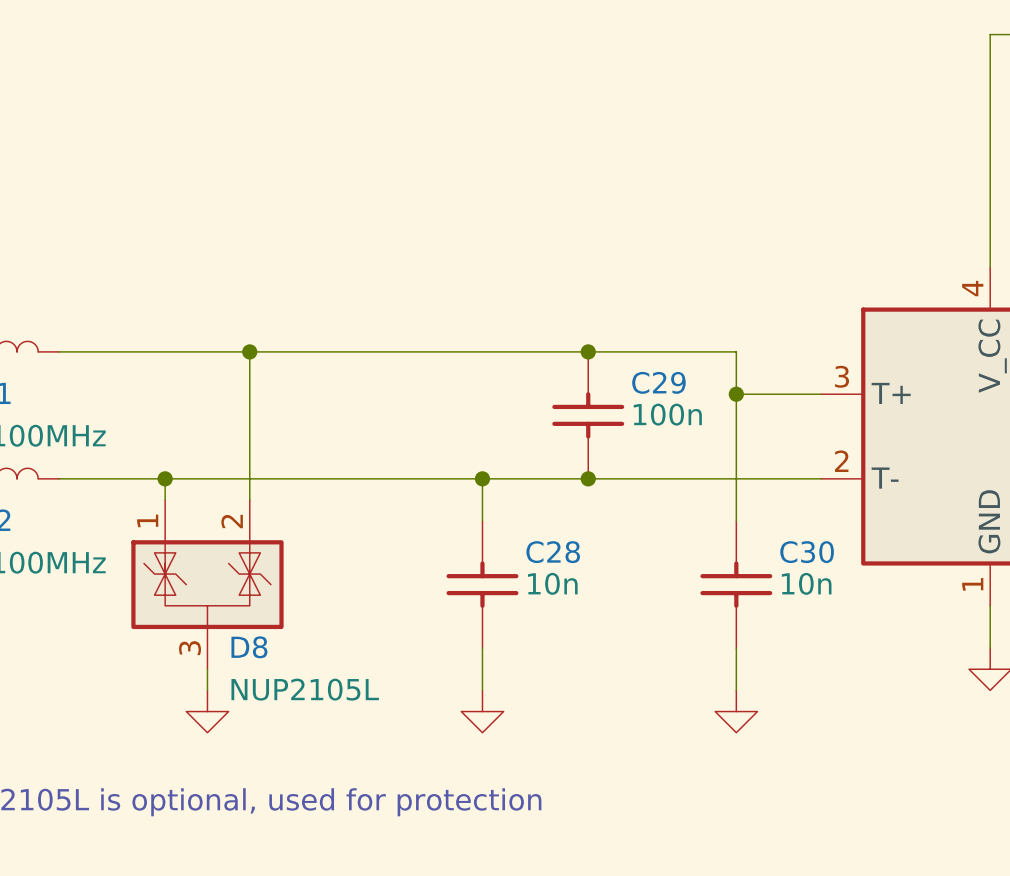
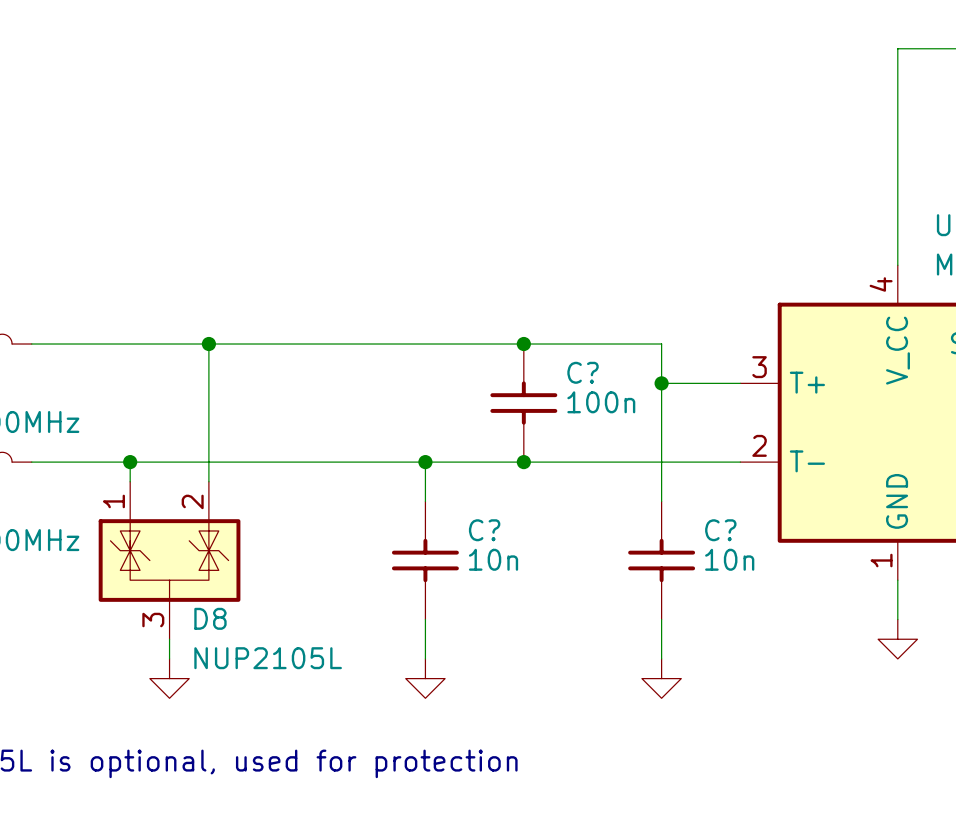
C29 name: C29 (658, 382) -> C? (583, 372)
C28 name: C28 (553, 552) -> C? (484, 530)
C30 name: C30 (807, 552) -> C? (720, 530)

